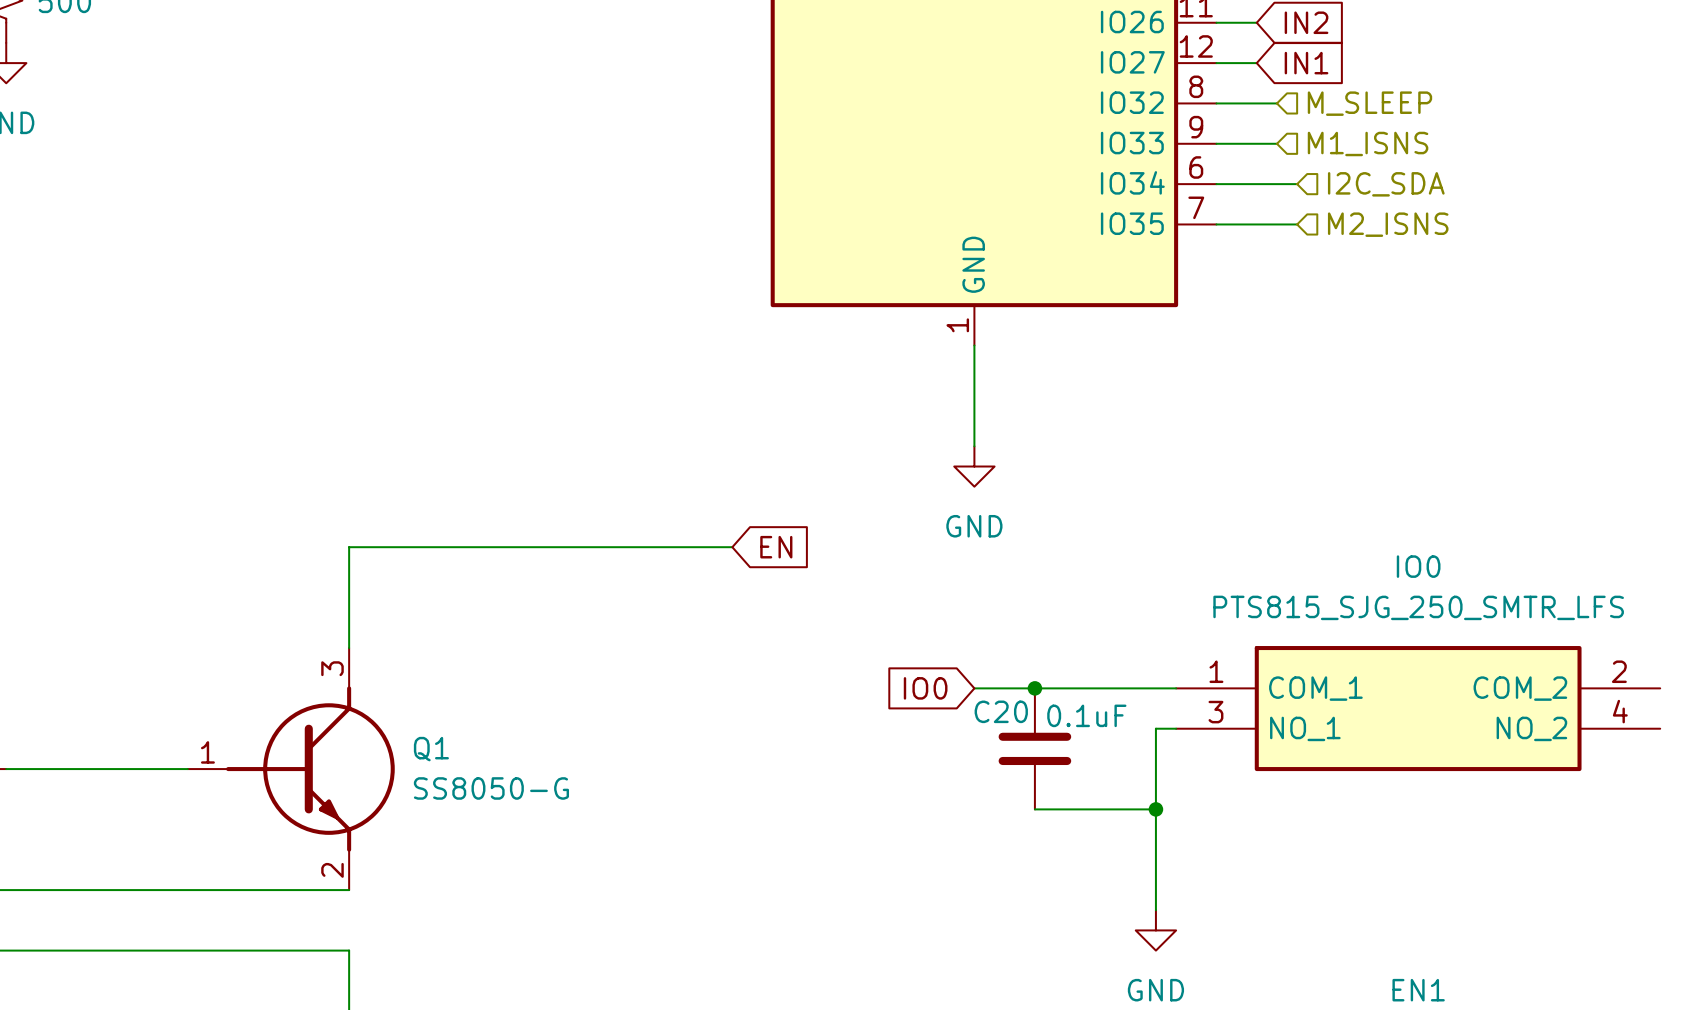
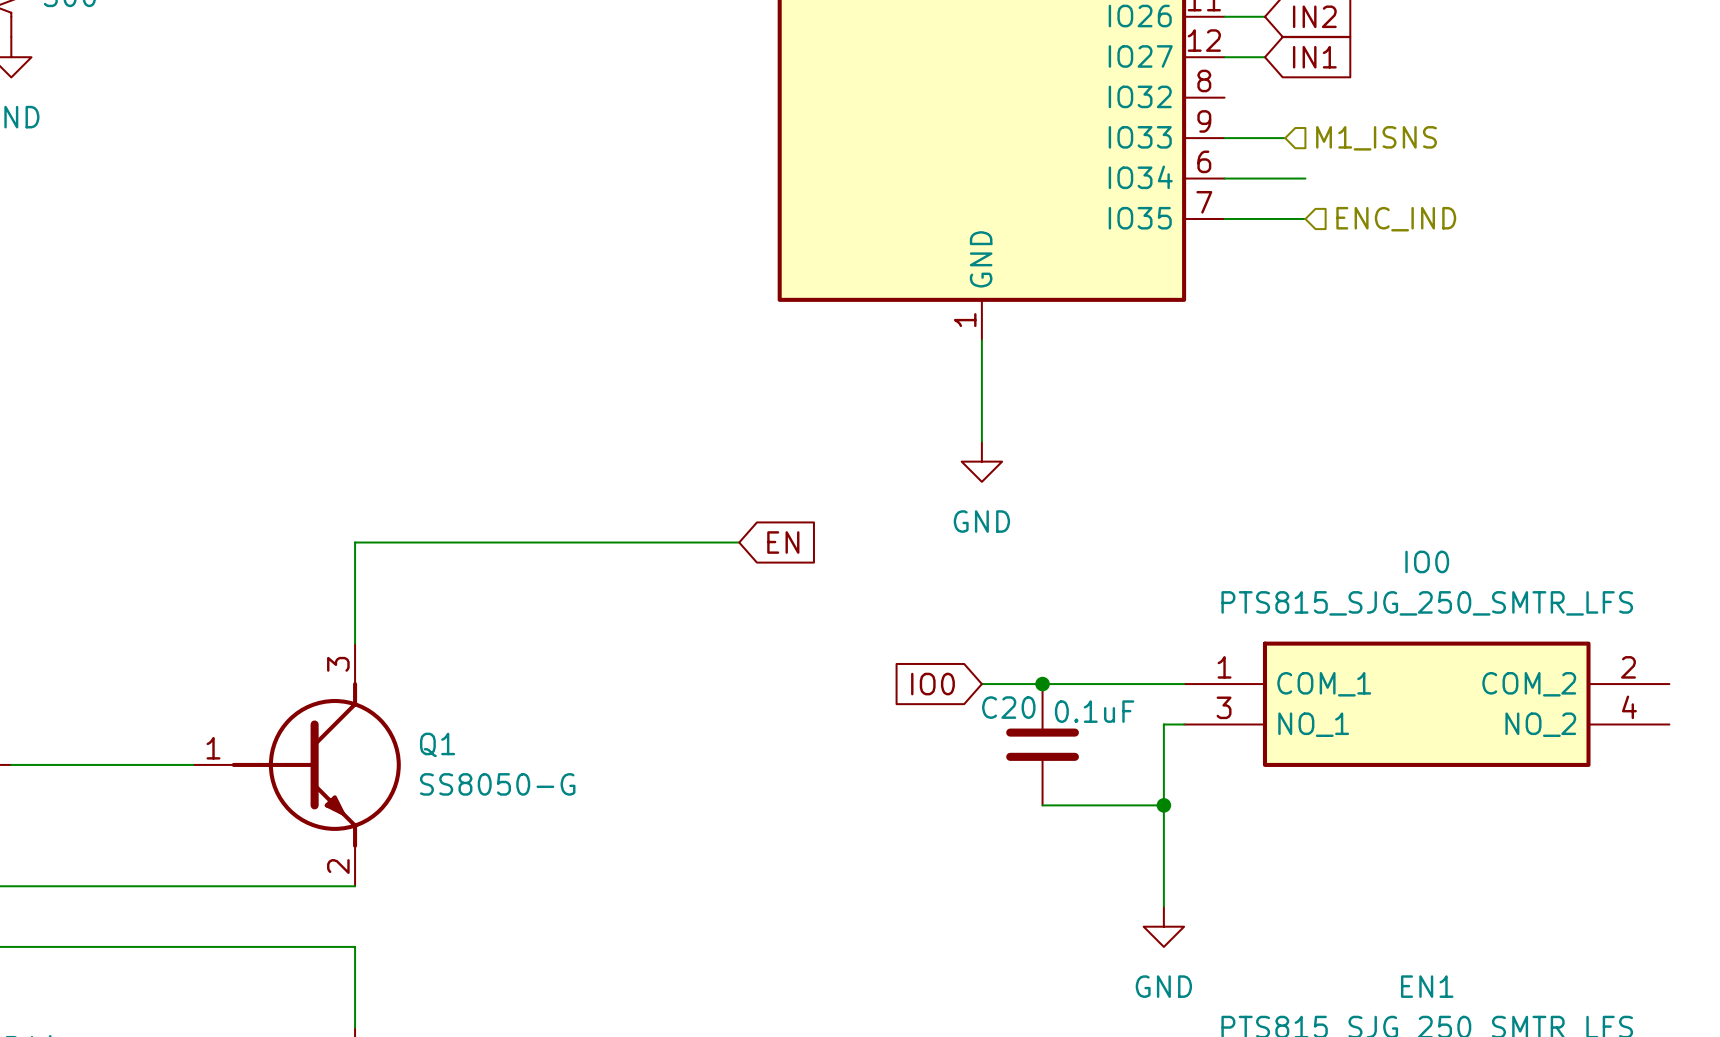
wire: (1216, 103) (1276, 103) -> none
hierarchical label: M_SLEEP (1369, 103) -> none
hierarchical label: I2C_SDA (1386, 184) -> none
hierarchical label: M2_ISNS (1388, 224) -> ENC_IND (1396, 219)

